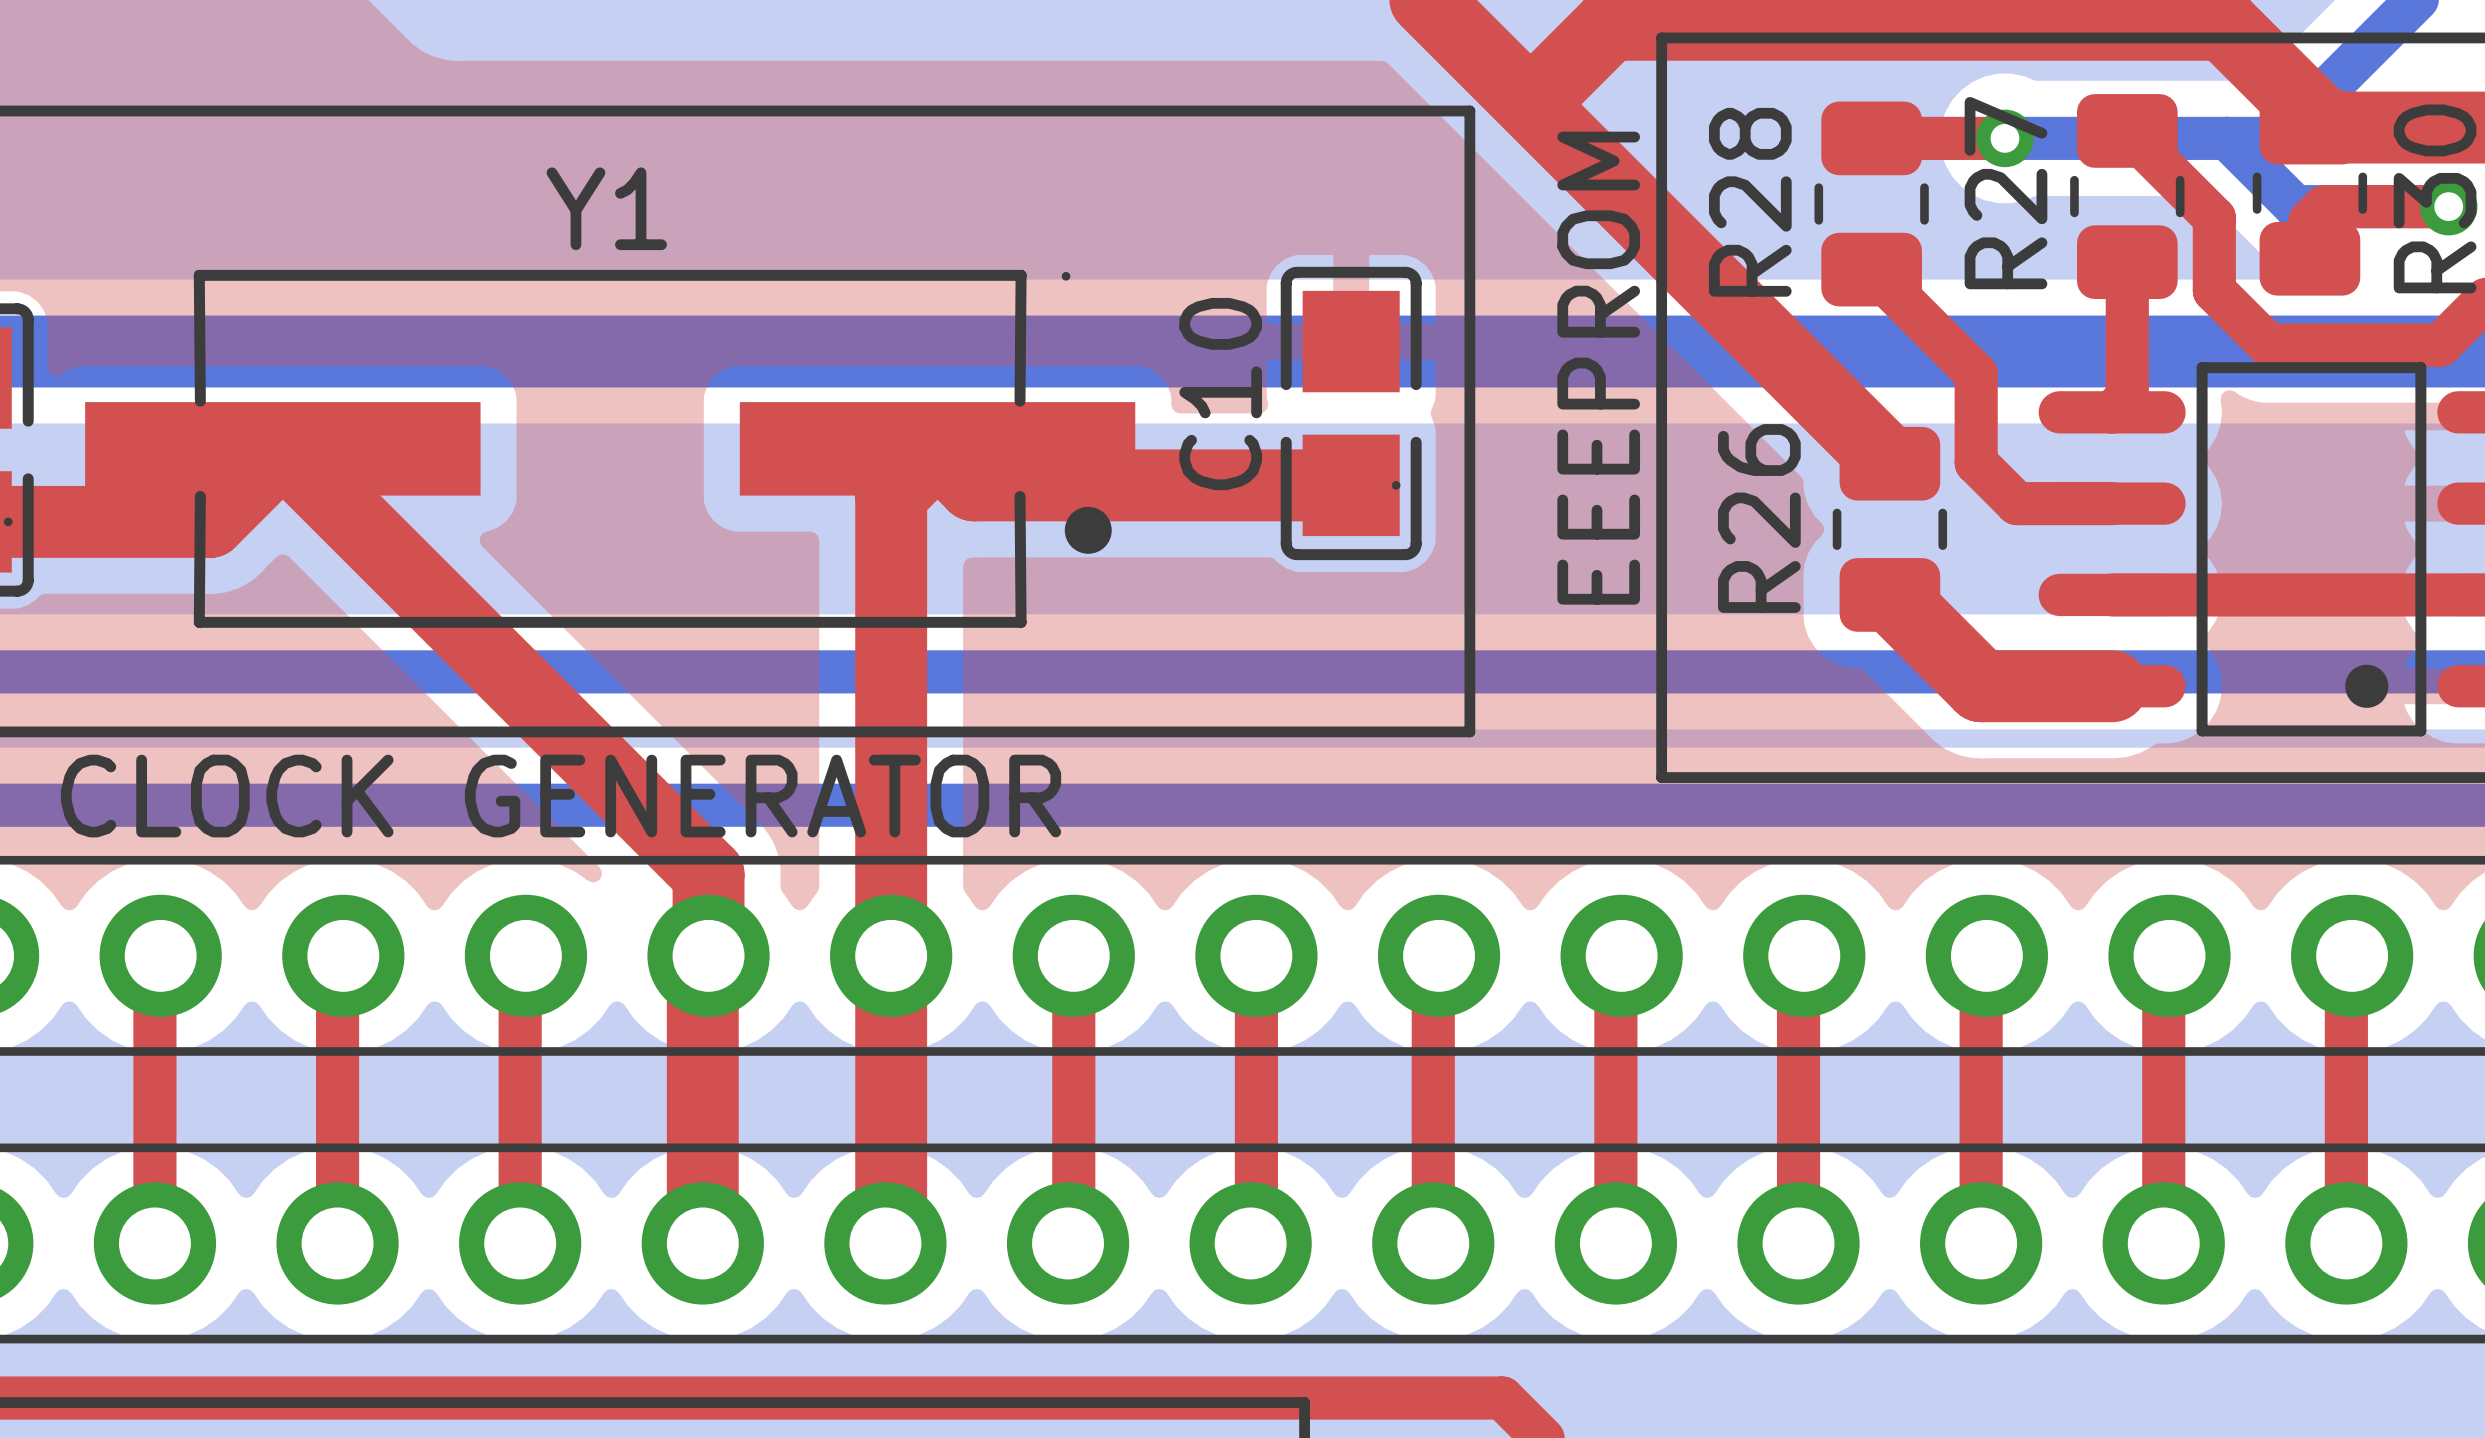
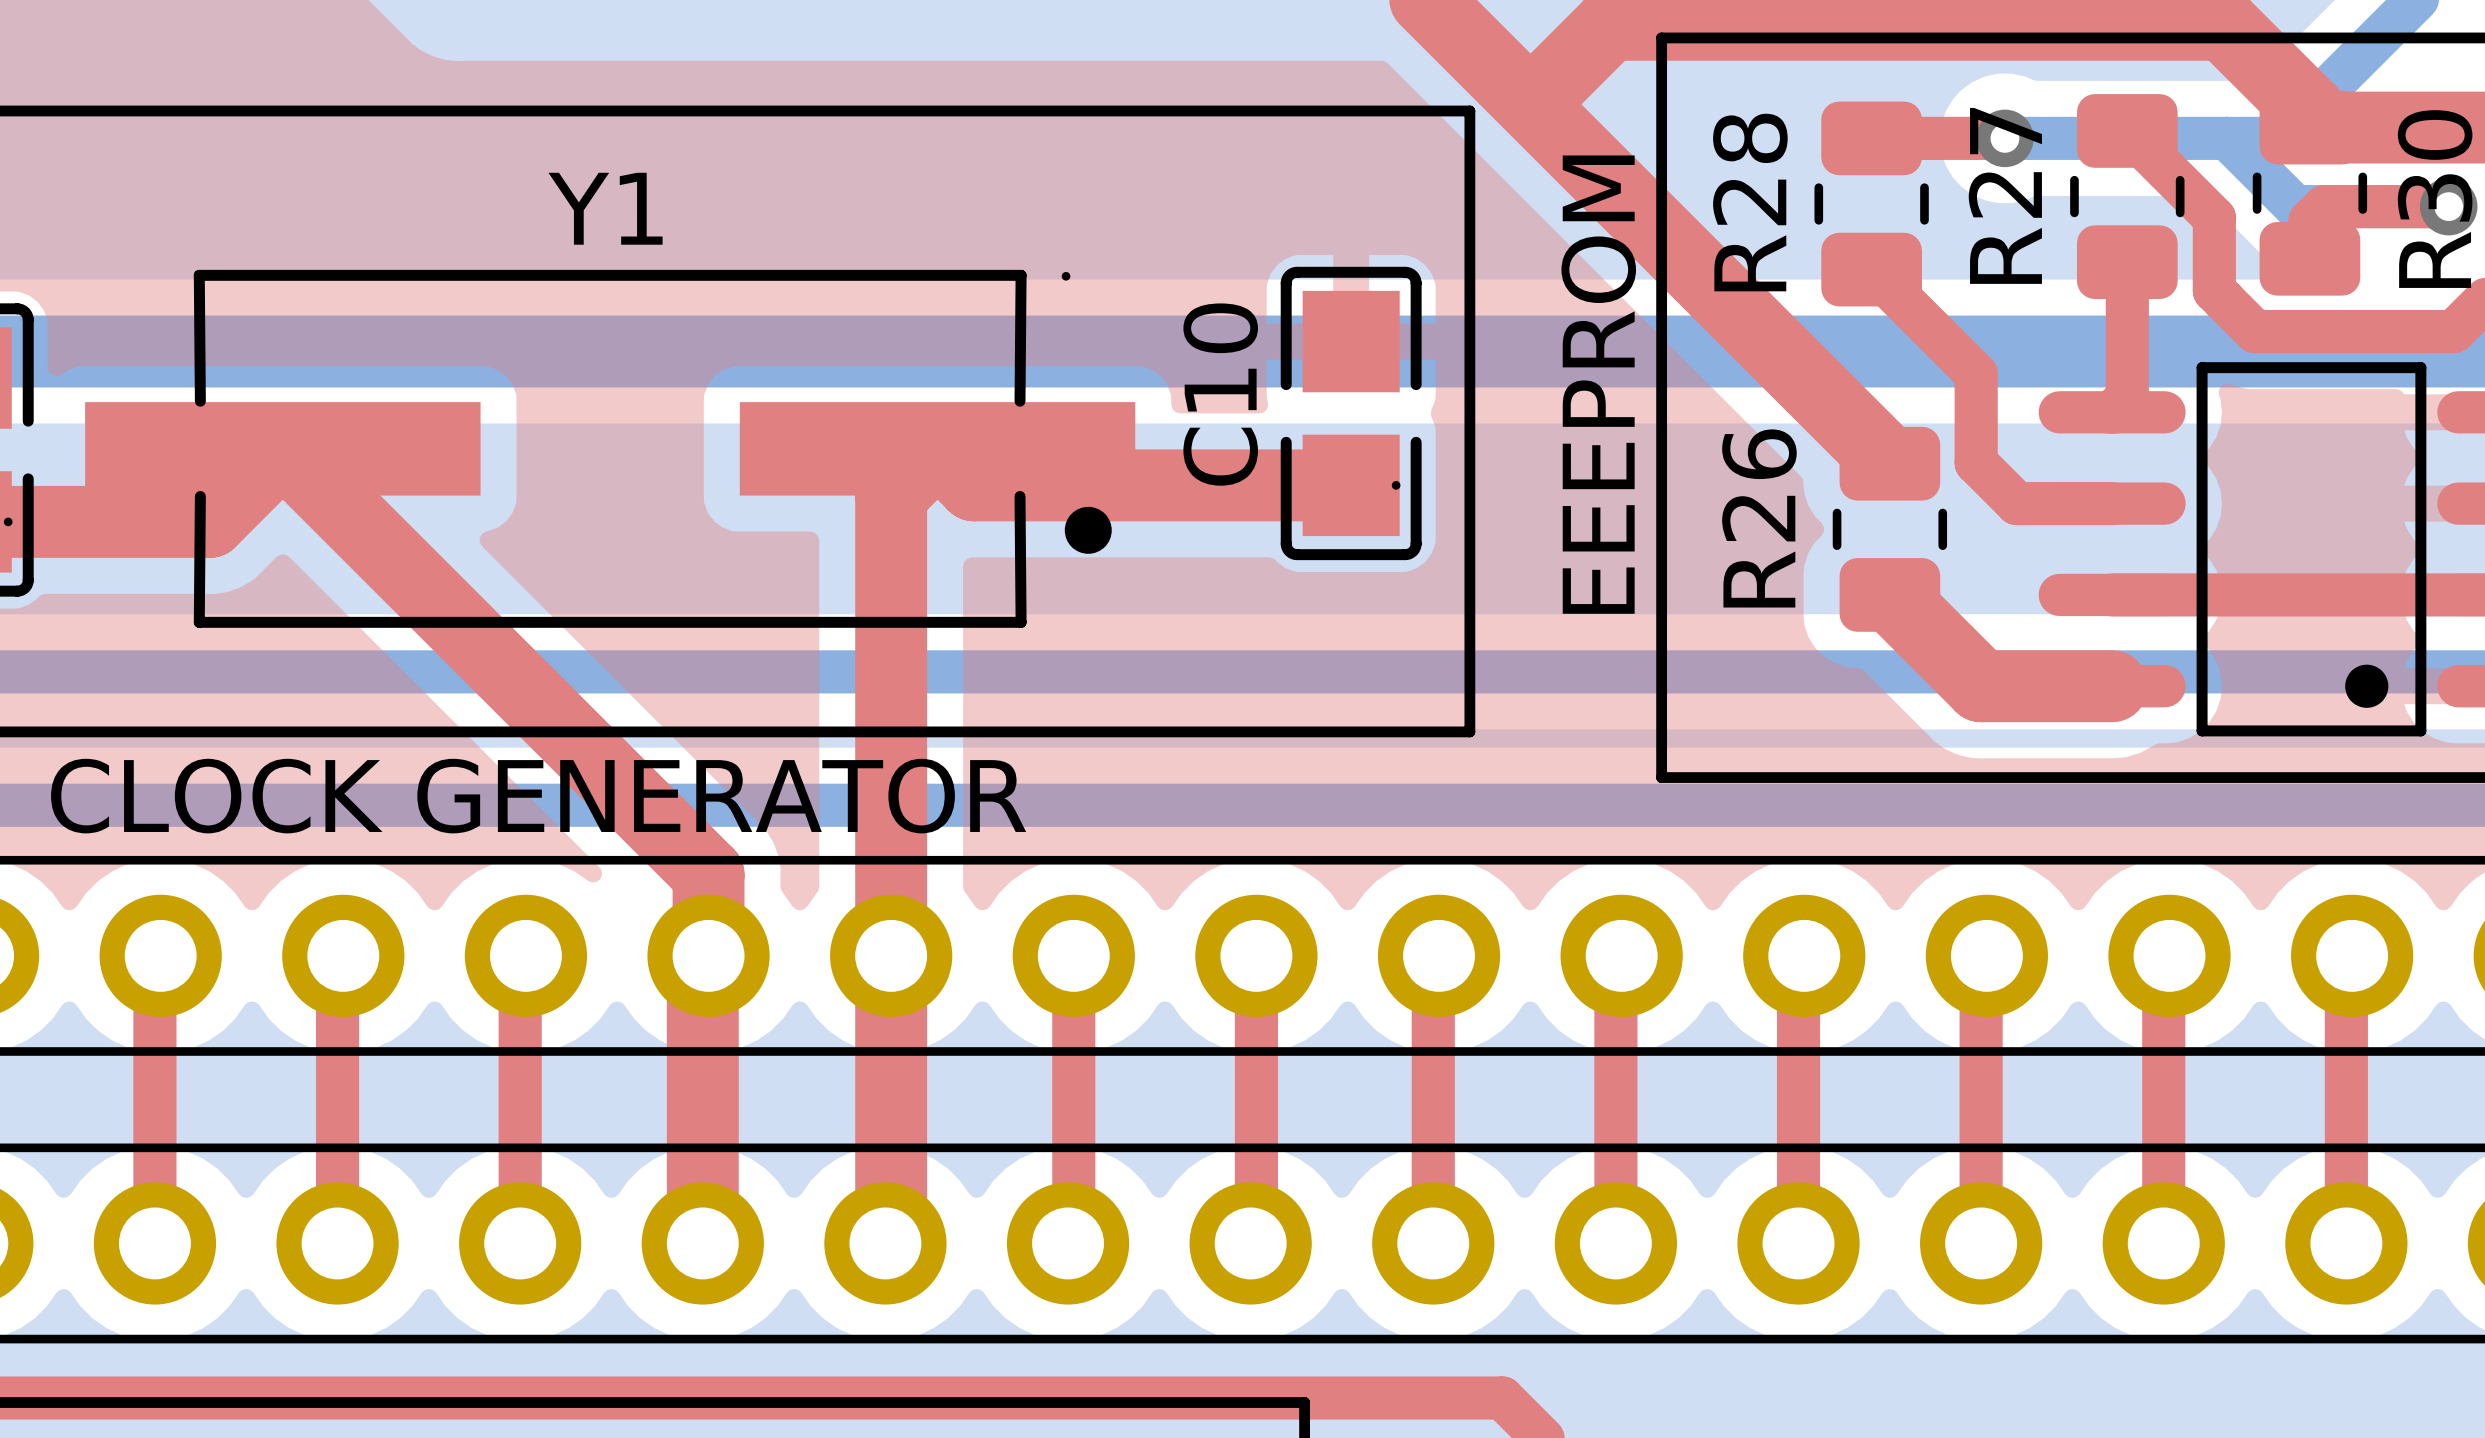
top track: (2255, 331) (2268, 345) (2440, 345) (2453, 331) -> (2255, 331) (2453, 331)

